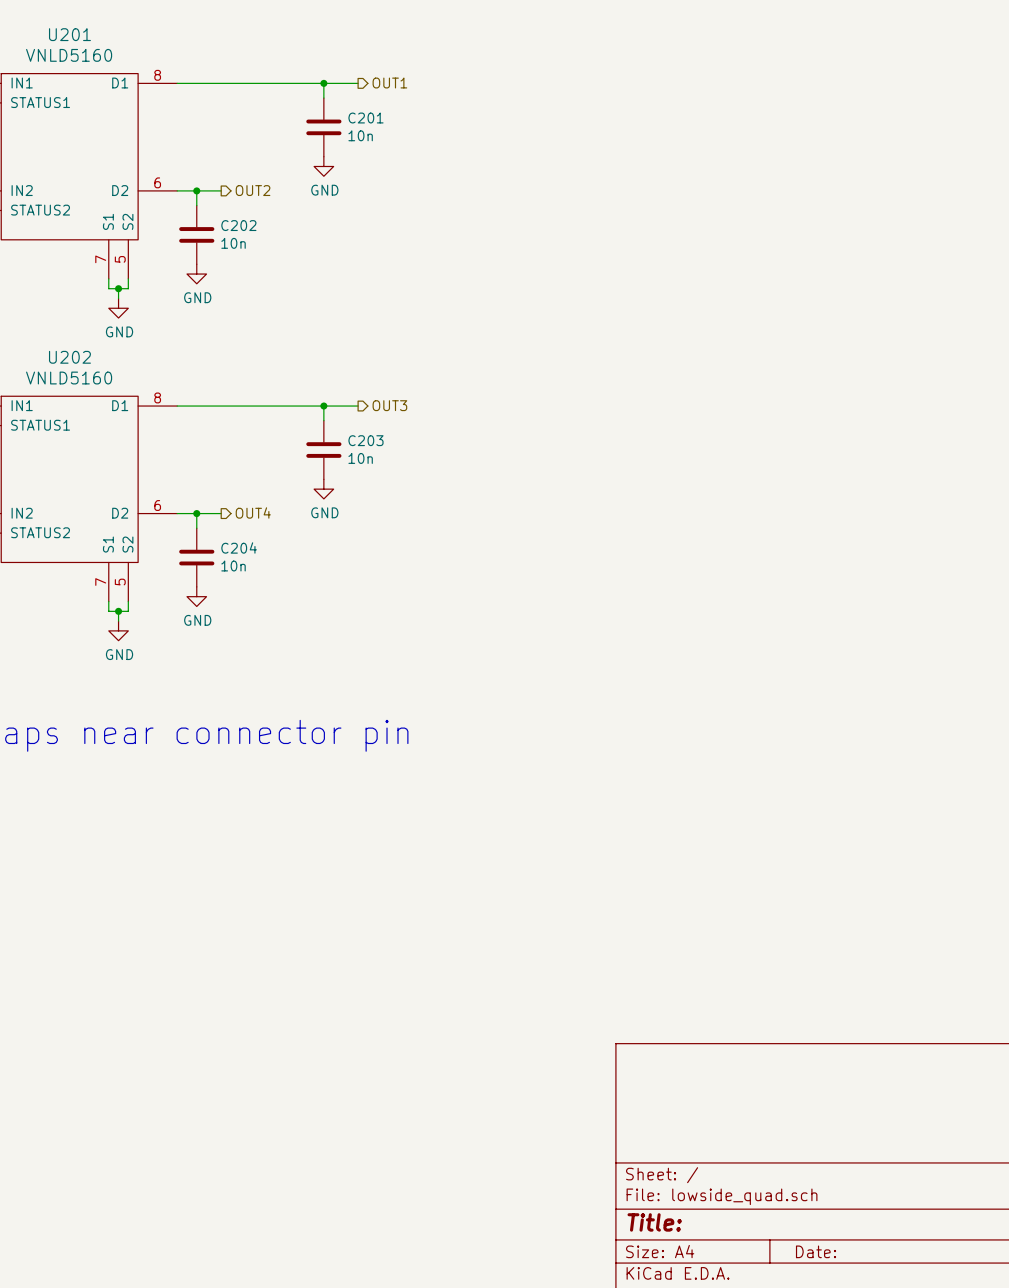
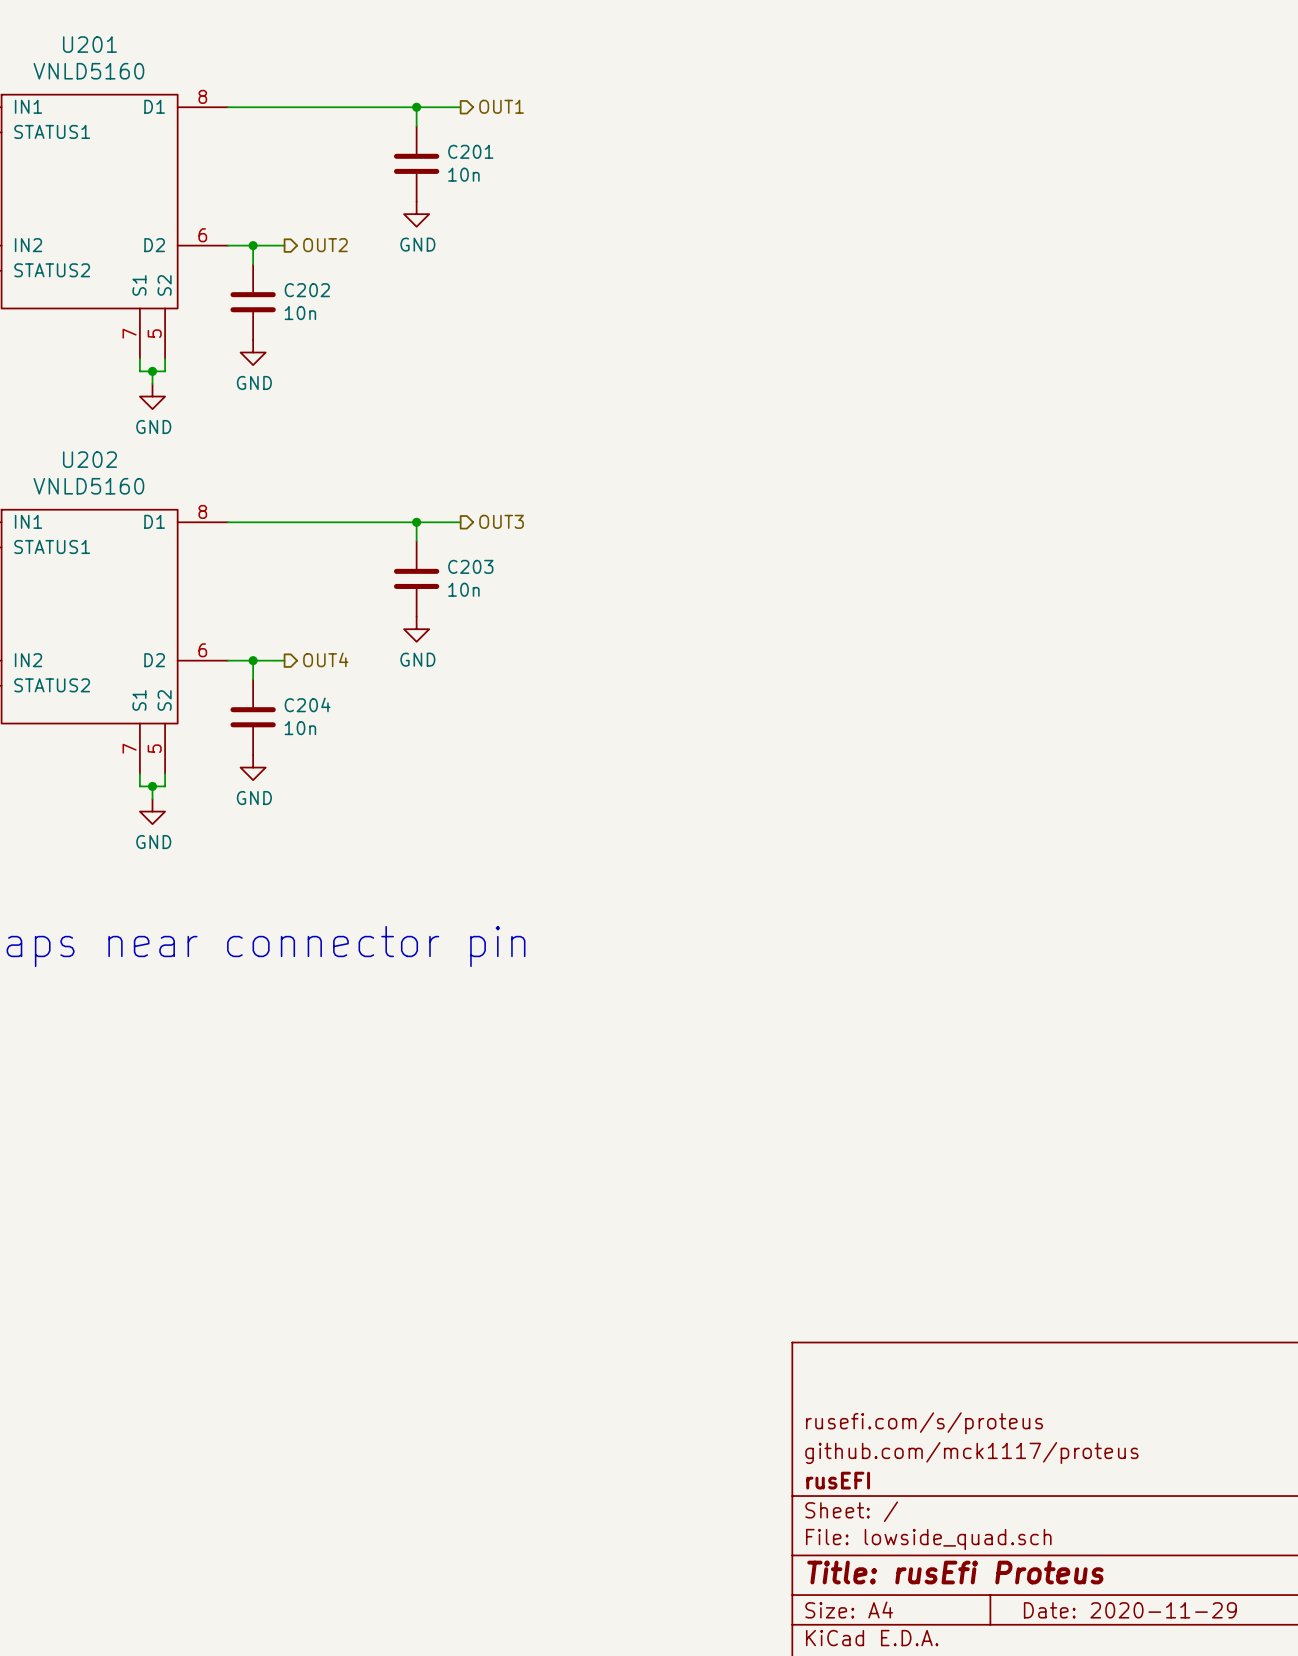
title block: none -> rusefi.com/s/proteus (924, 1423)
title block: none -> github.com/mck1117/proteus (971, 1453)
title block: none -> rusEFI (838, 1480)
title block: Title: (654, 1222) -> Title: rusEfi Proteus (955, 1572)
title block: Date: (816, 1251) -> Date: 2020-11-29 (1130, 1610)

